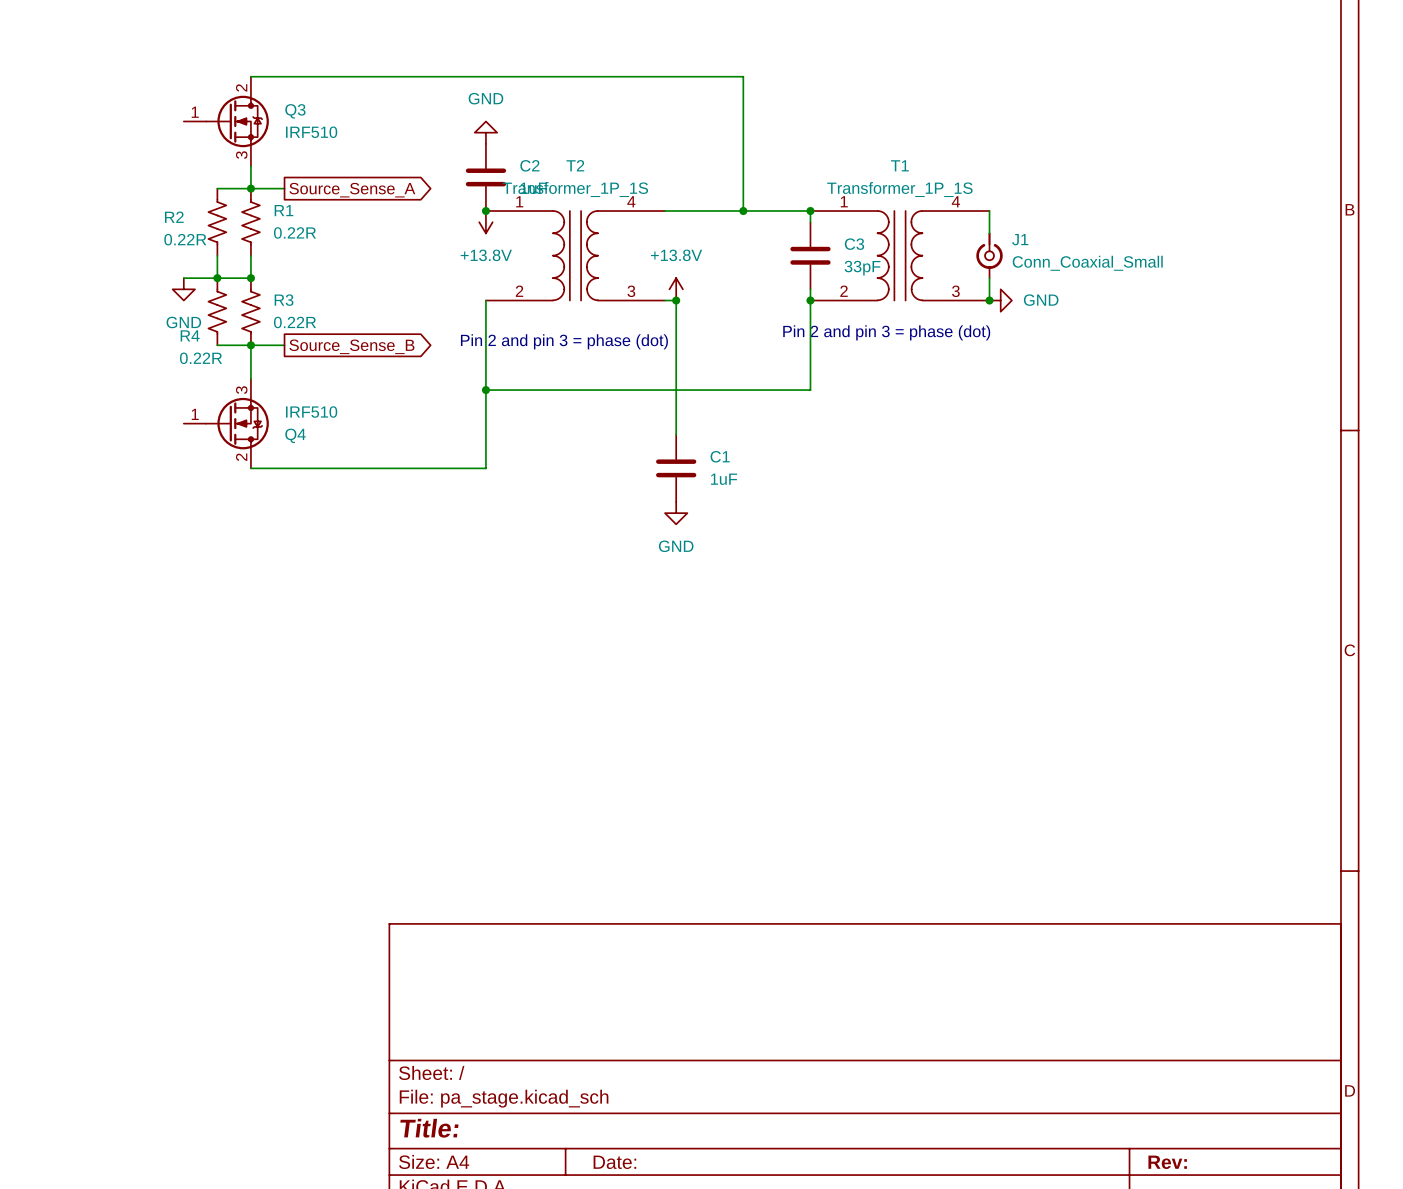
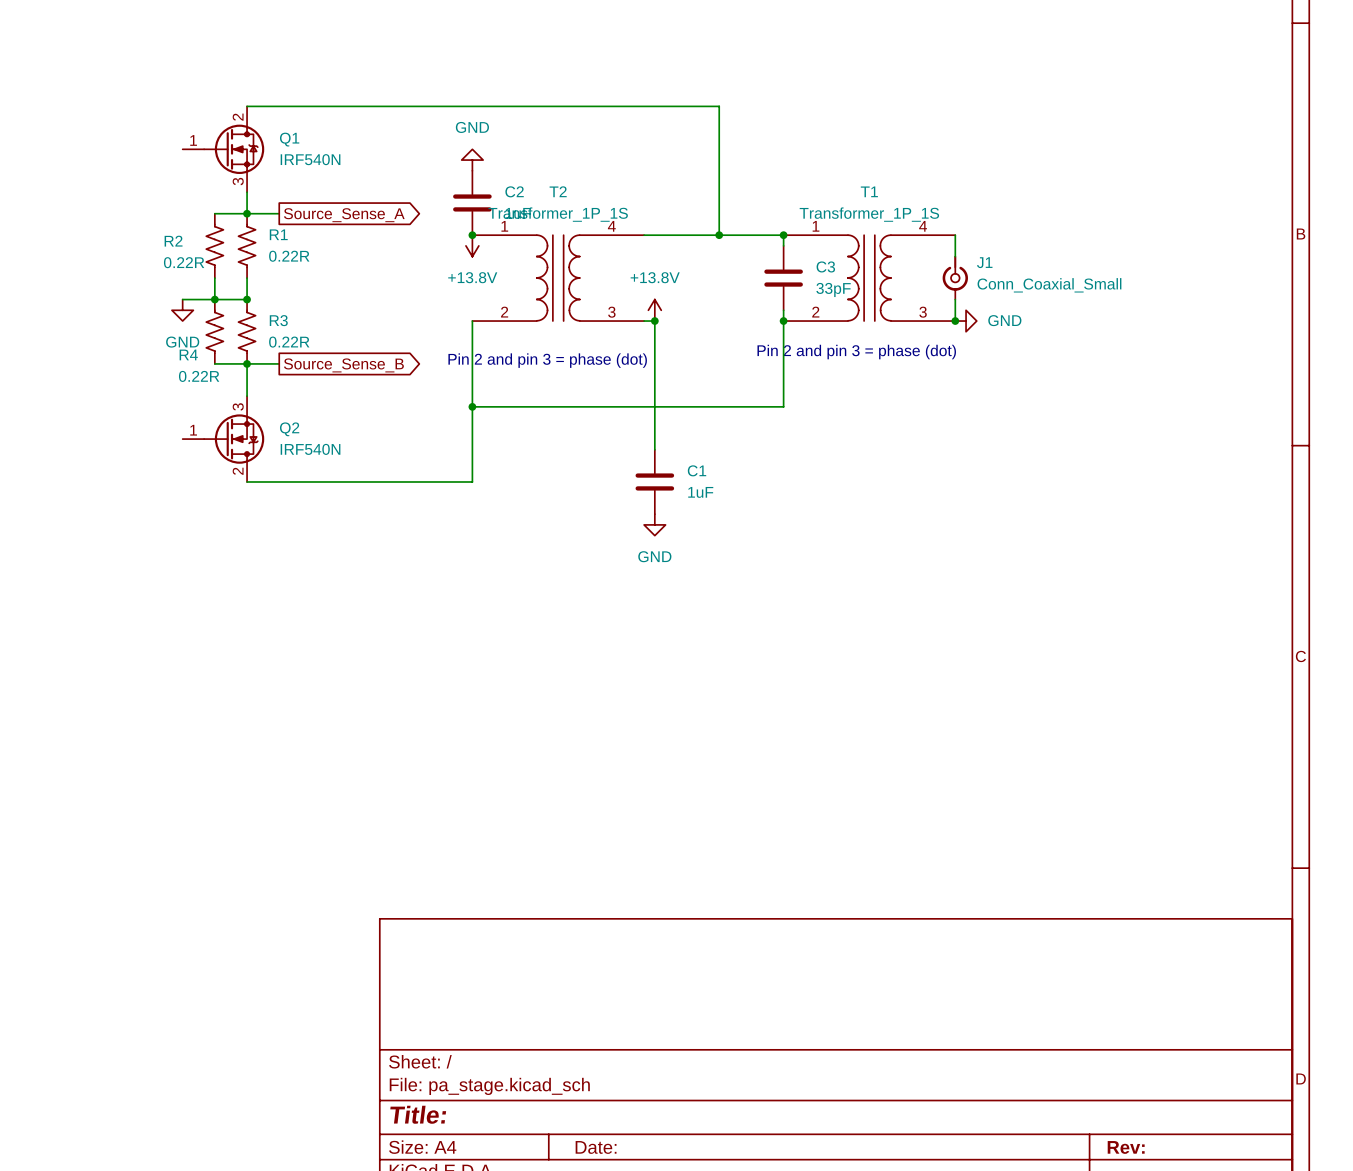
Q3 name: Q3 (295, 111) -> Q1 (289, 139)
Q3 value: IRF510 (311, 132) -> IRF540N (310, 159)
Q4 value: IRF510 (311, 412) -> IRF540N (310, 449)
Q4 name: Q4 (295, 435) -> Q2 (289, 429)

